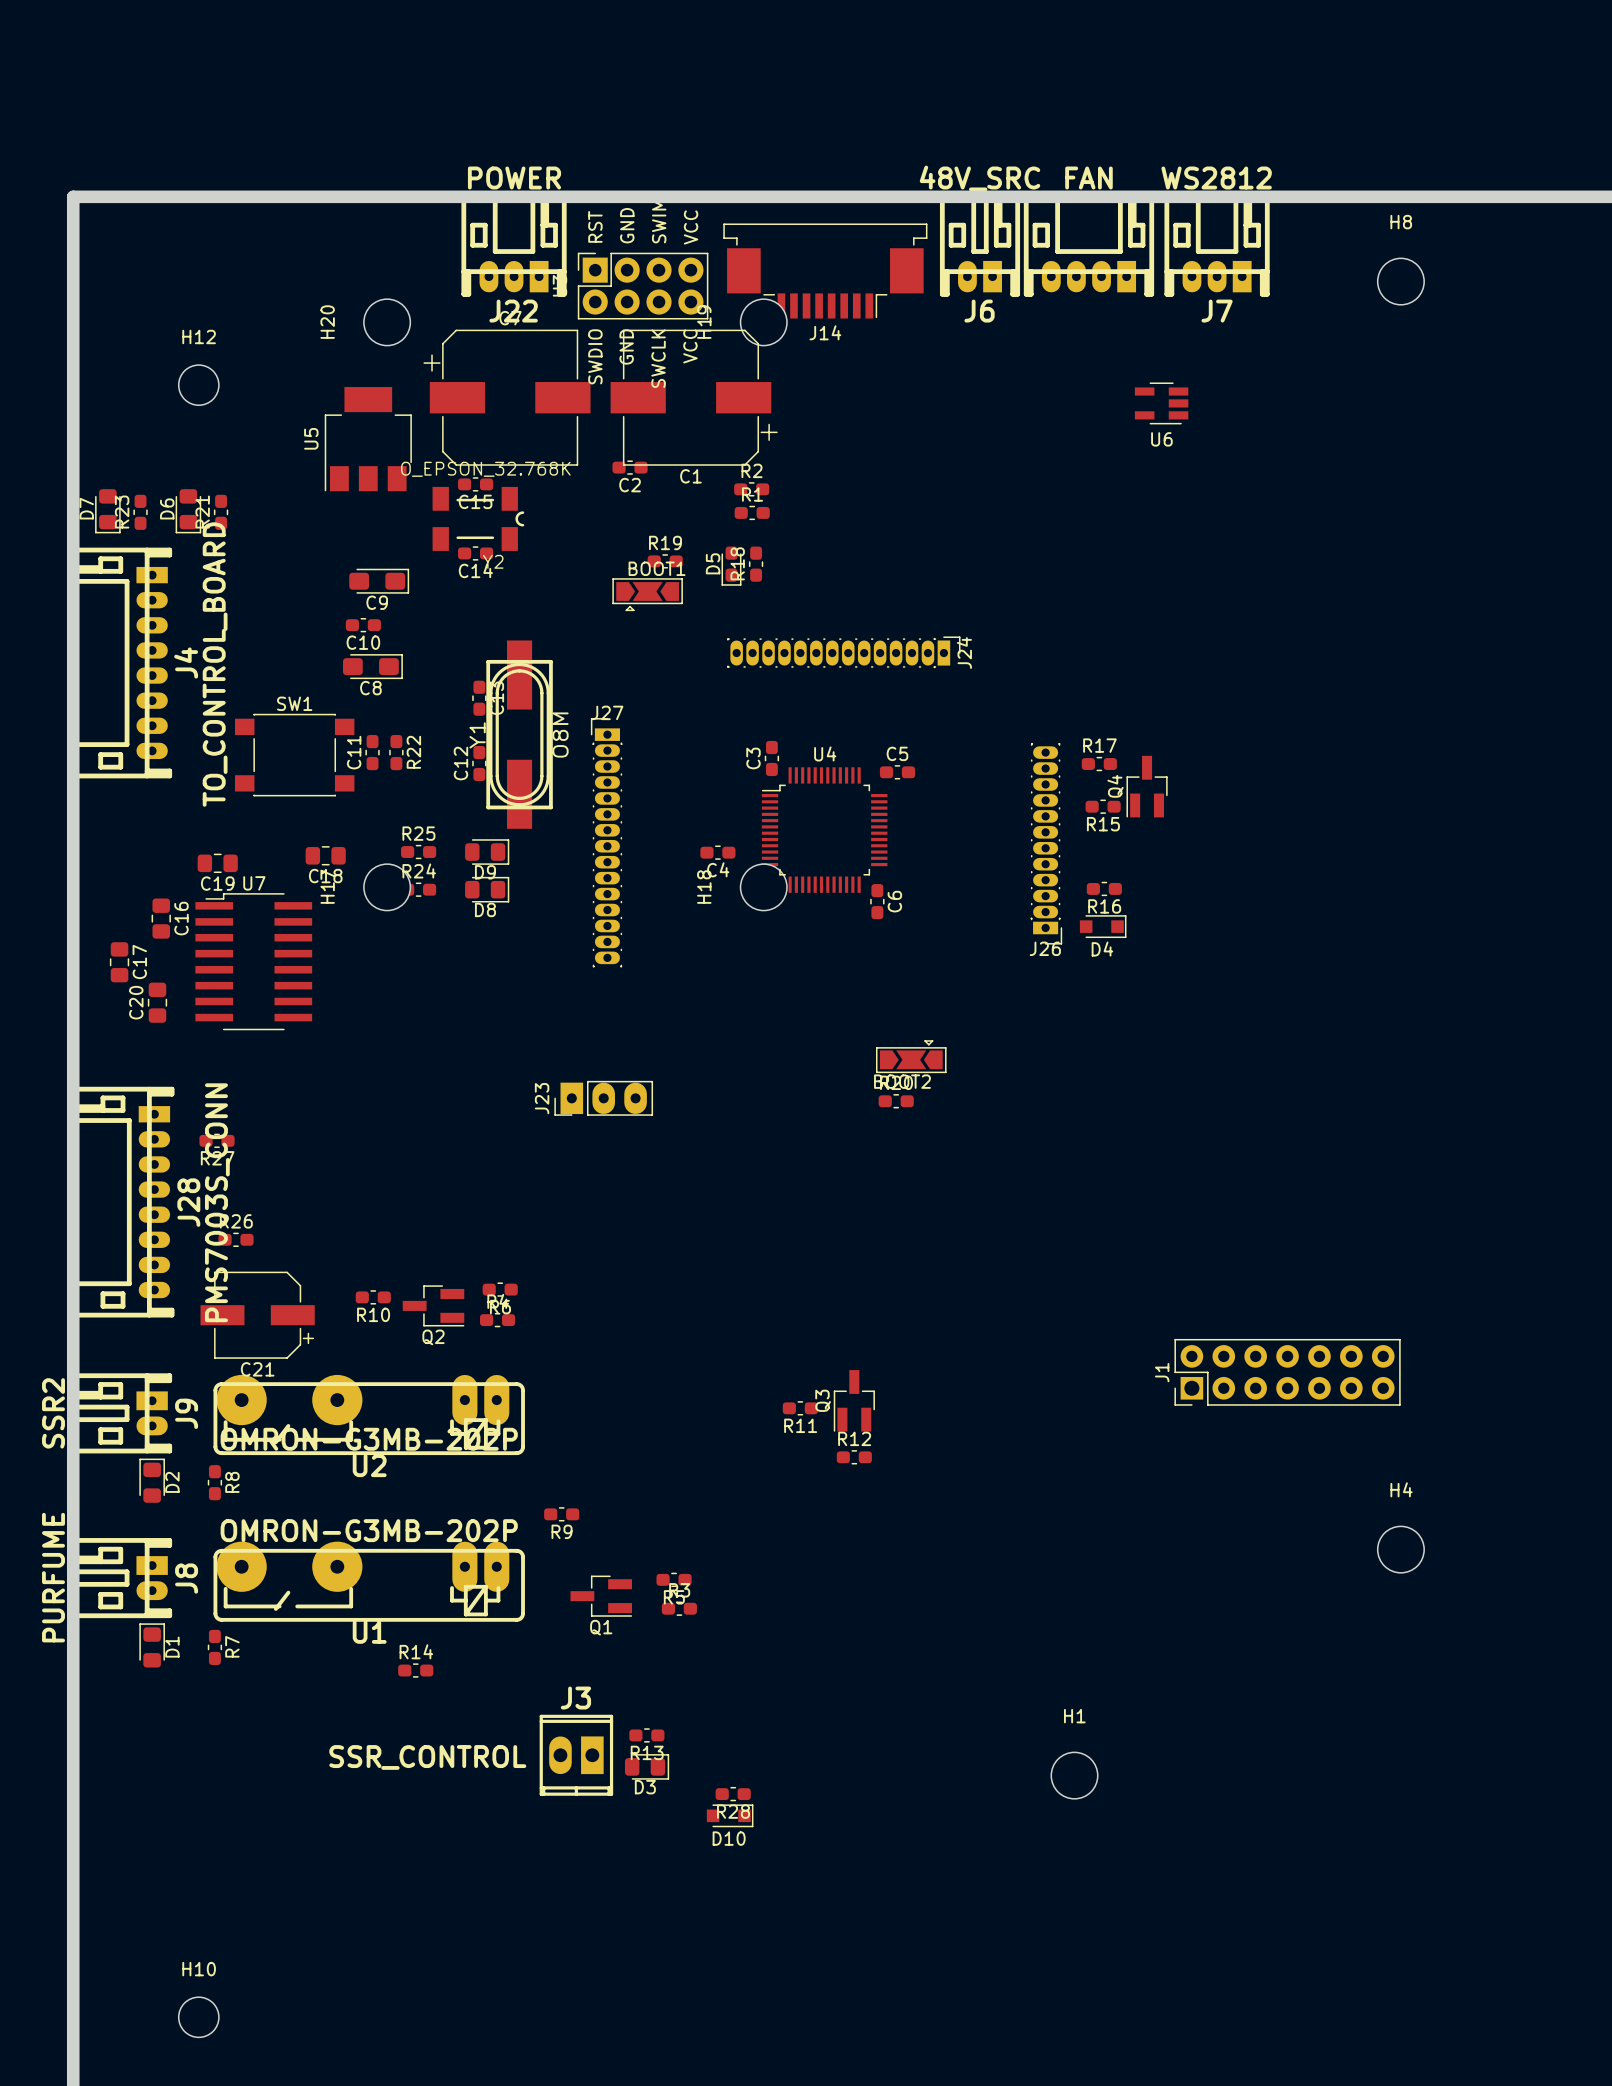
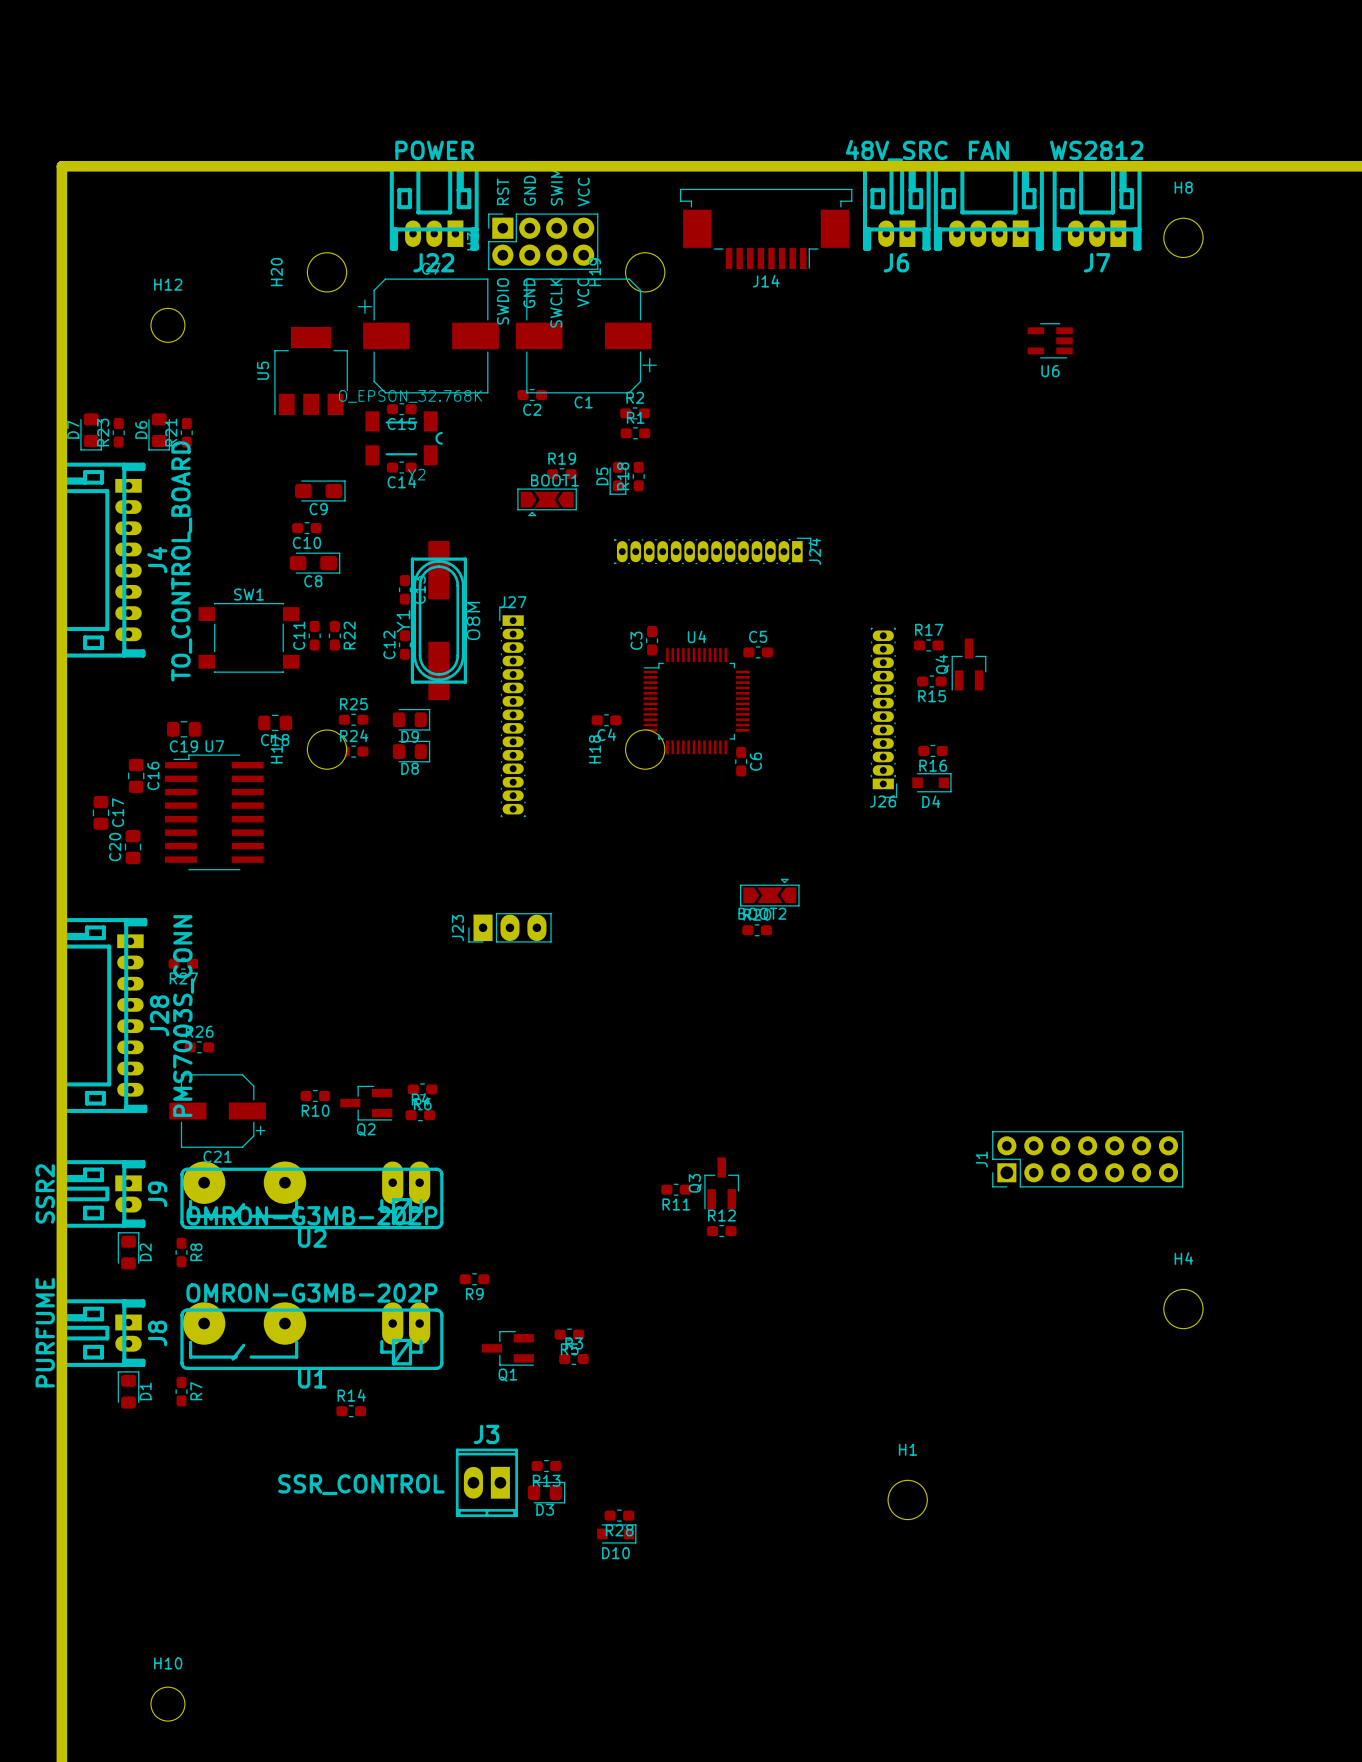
J6 position: (980, 245) -> (896, 207)
part position: (1088, 245) -> (988, 207)
J7 position: (1217, 245) -> (1097, 207)
J14 position: (825, 270) -> (766, 228)
U6 position: (1161, 403) -> (1050, 340)

